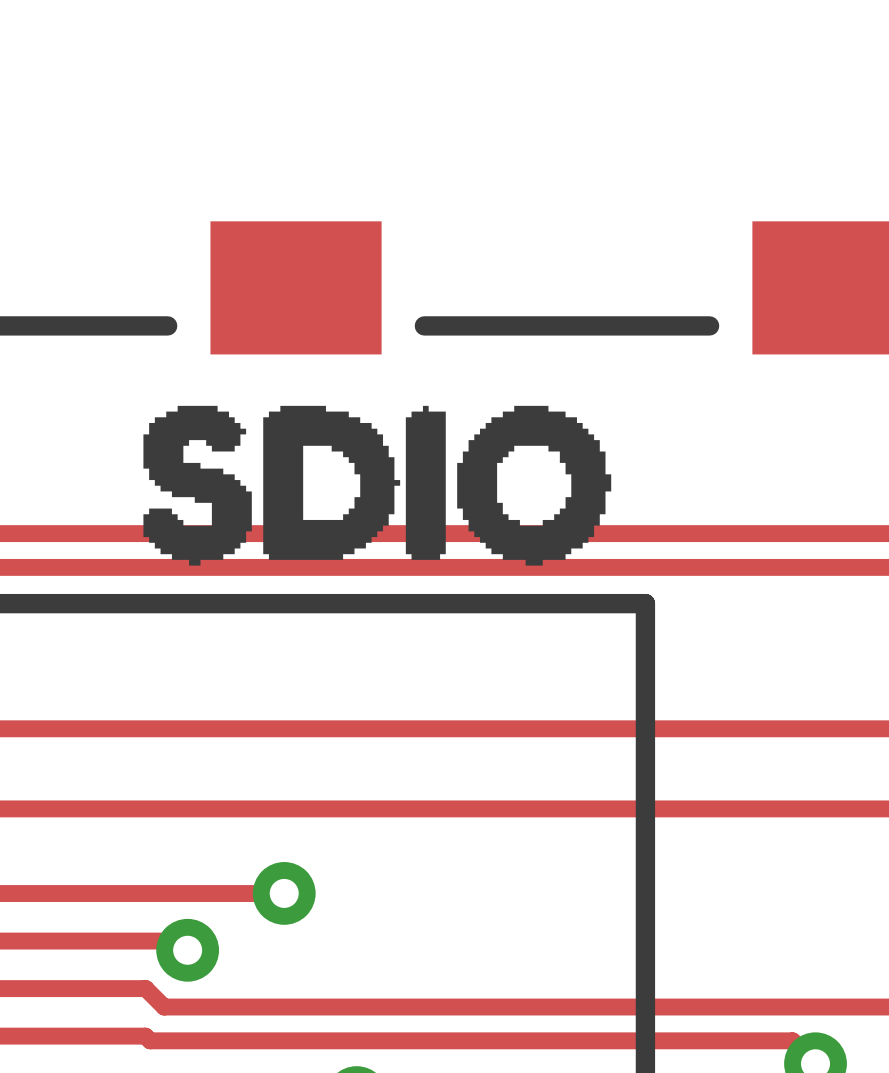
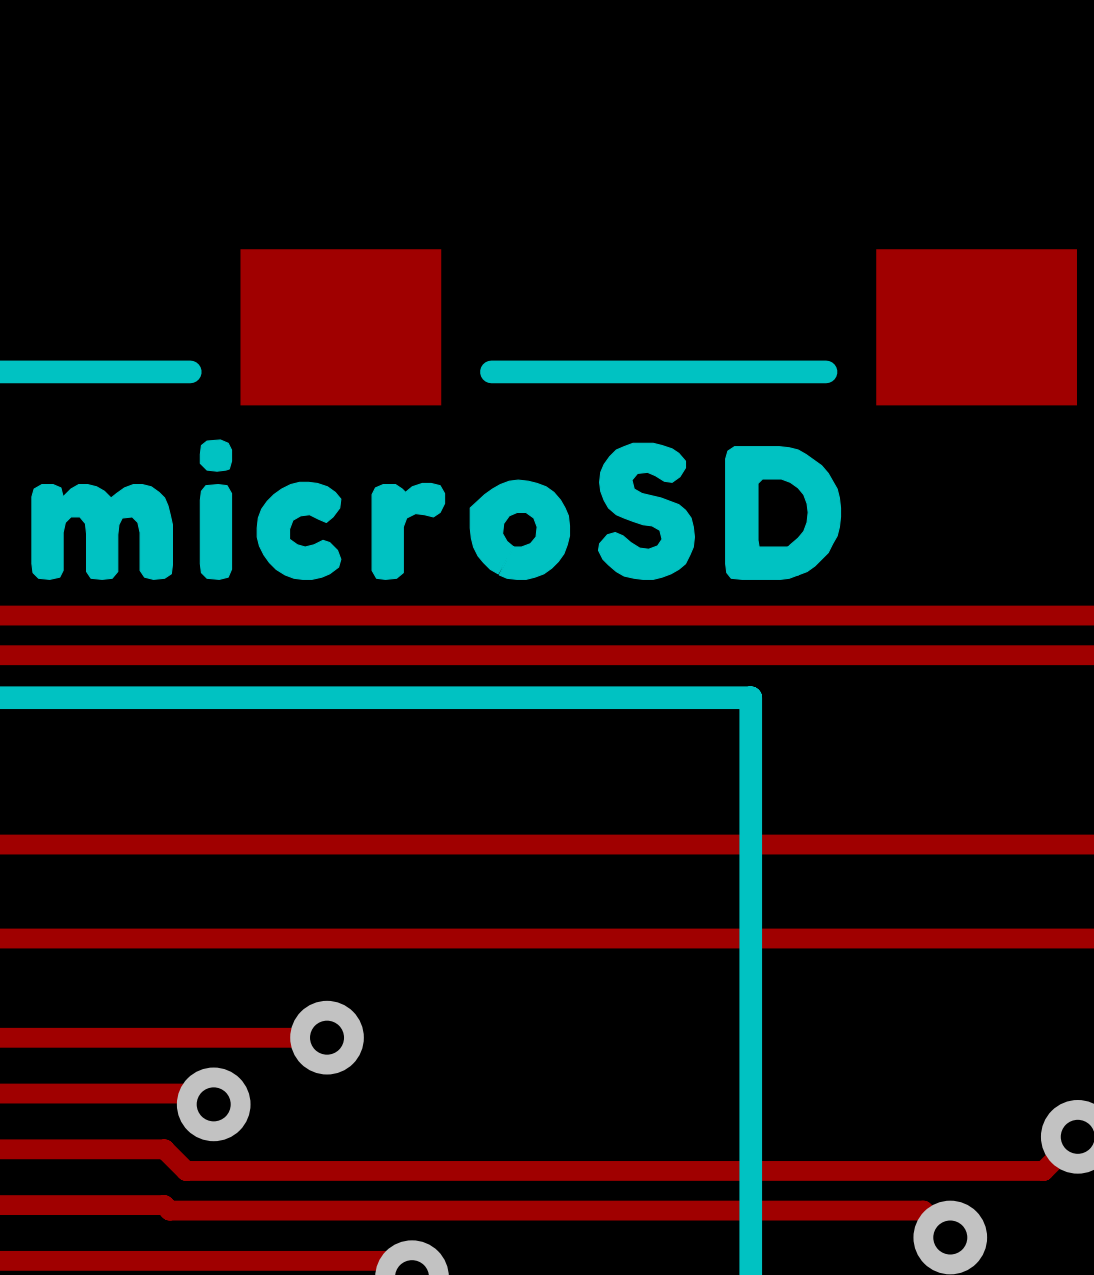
drawing shape: [143, 405, 612, 566] -> [31, 439, 842, 580]

